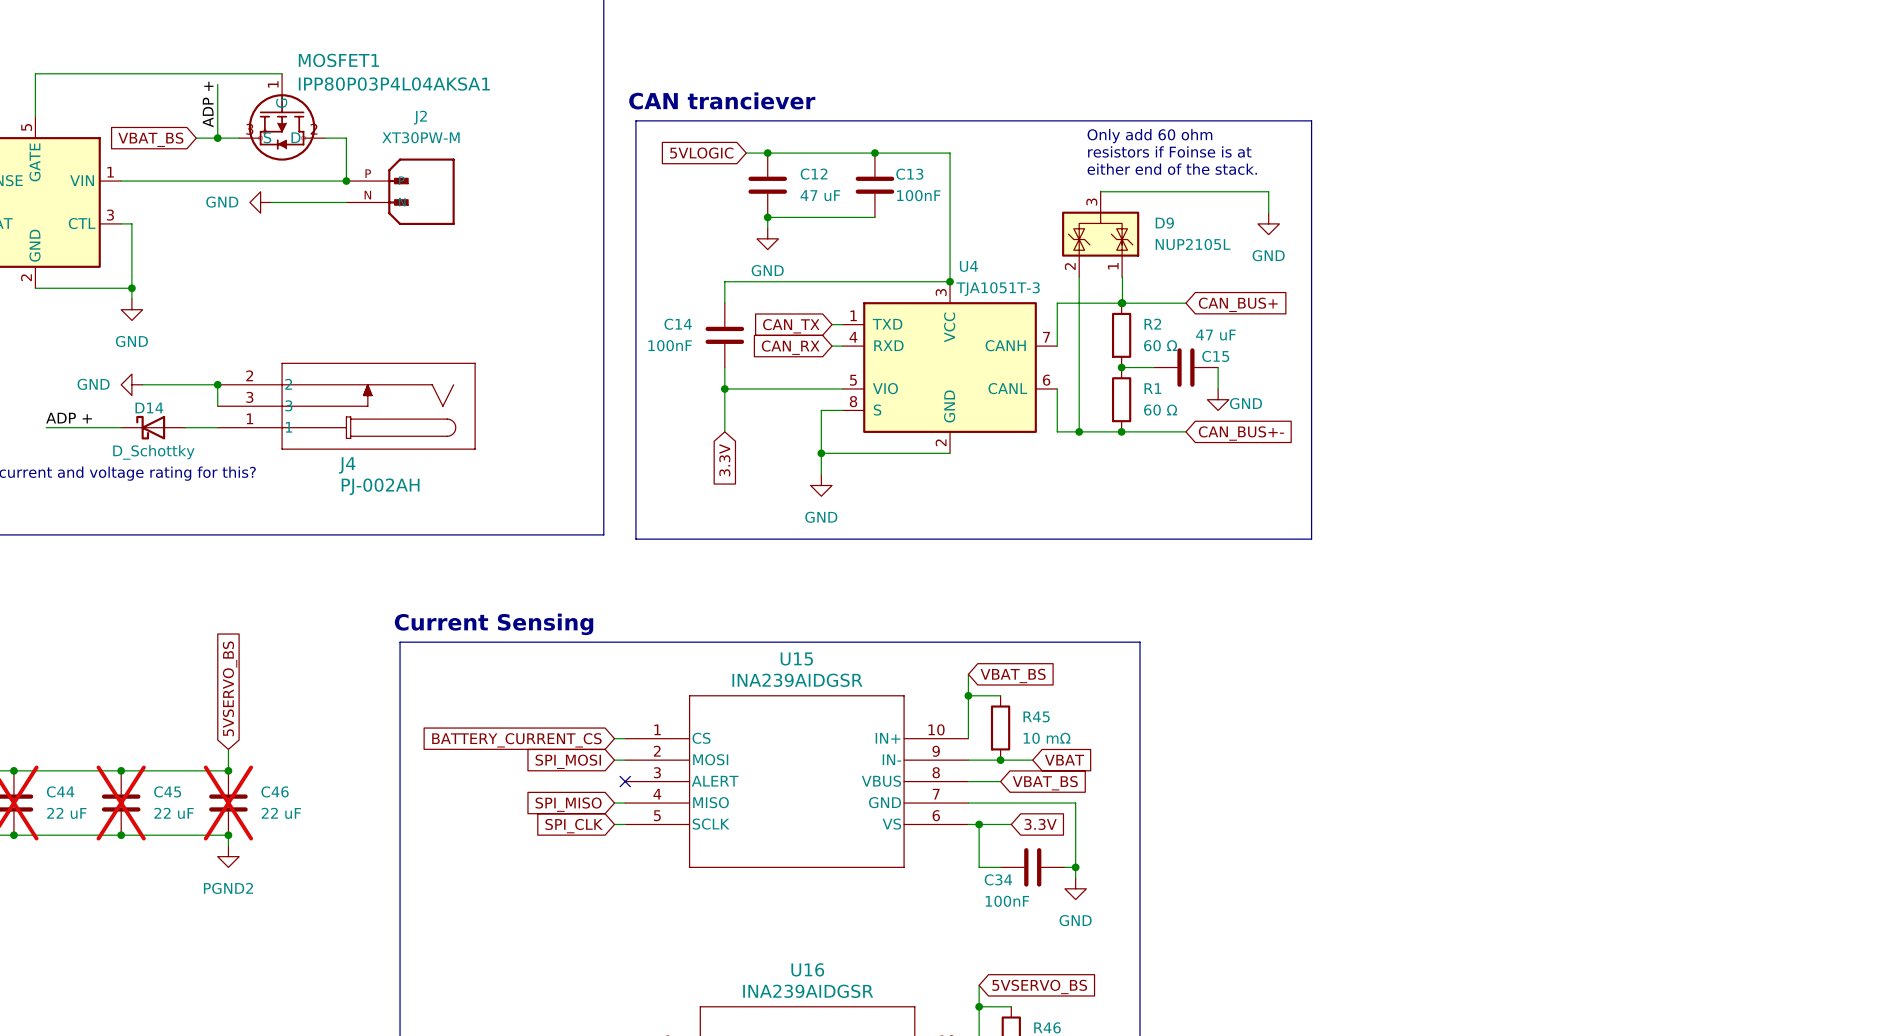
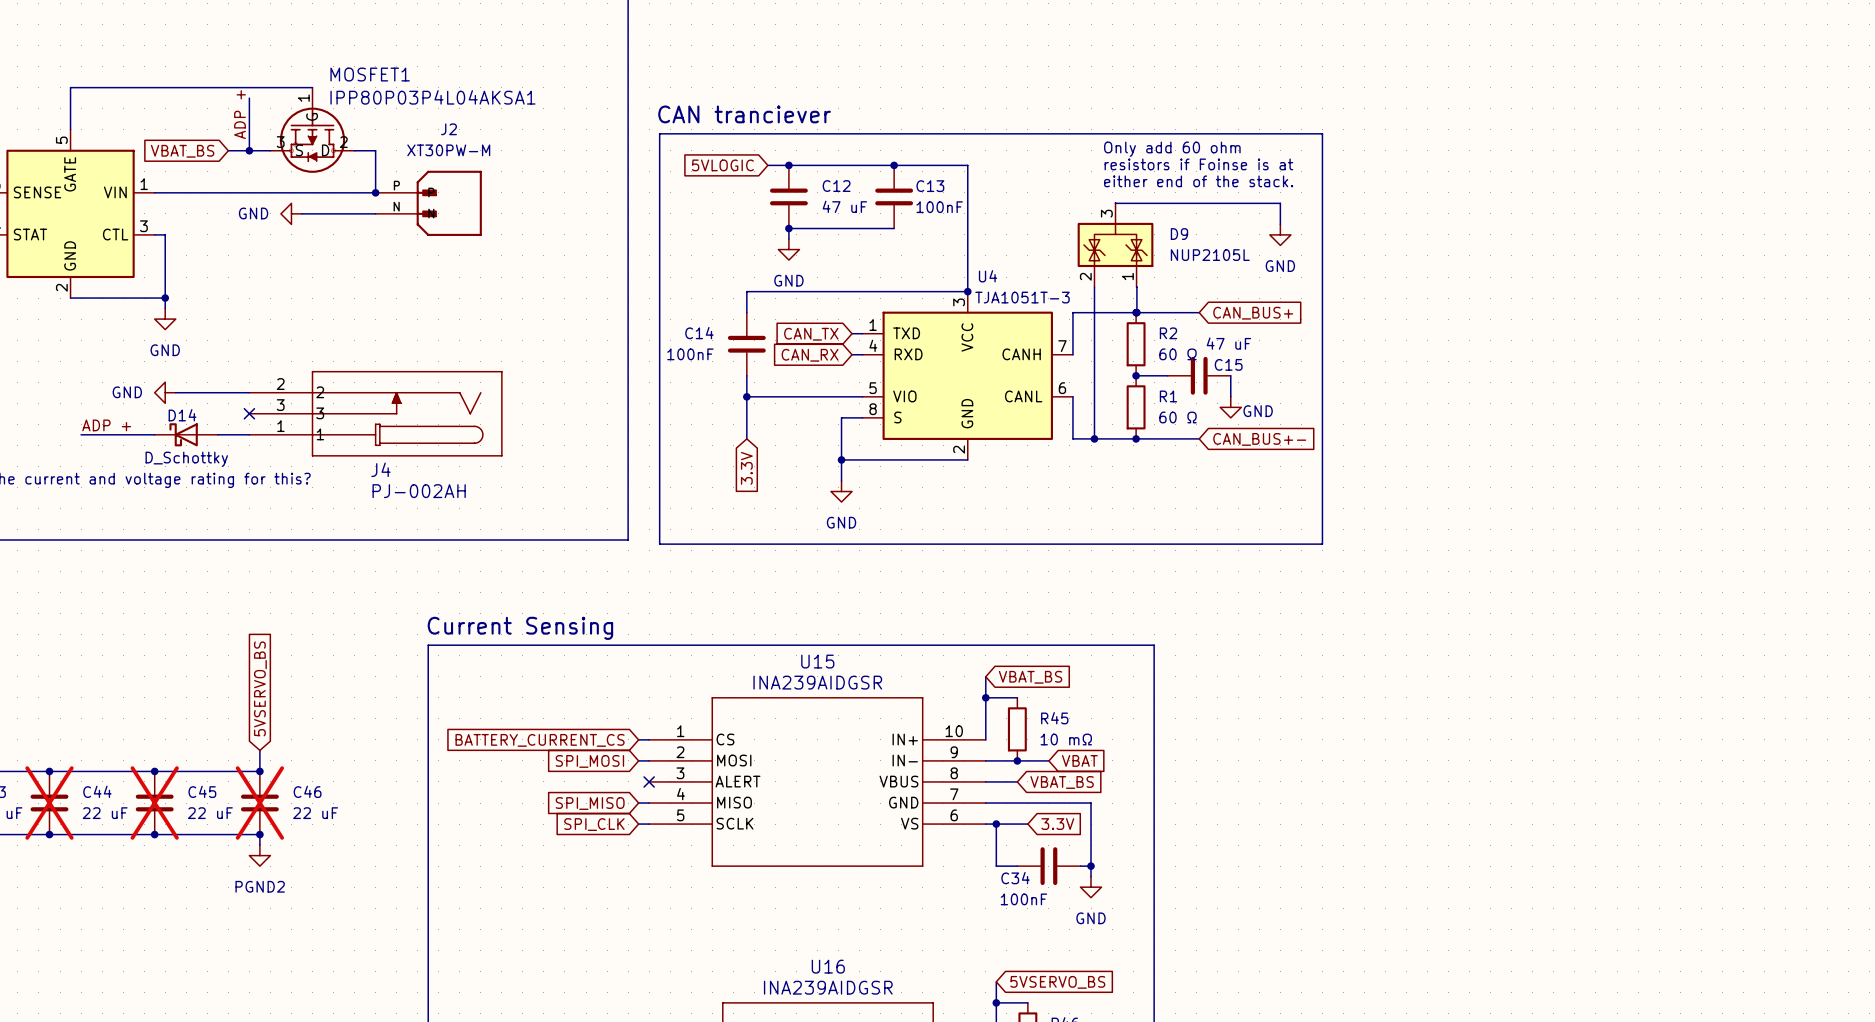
wire: (217, 384) (217, 406) -> none
junction: (217, 384) -> none
no-connect mark: none -> (249, 413)

